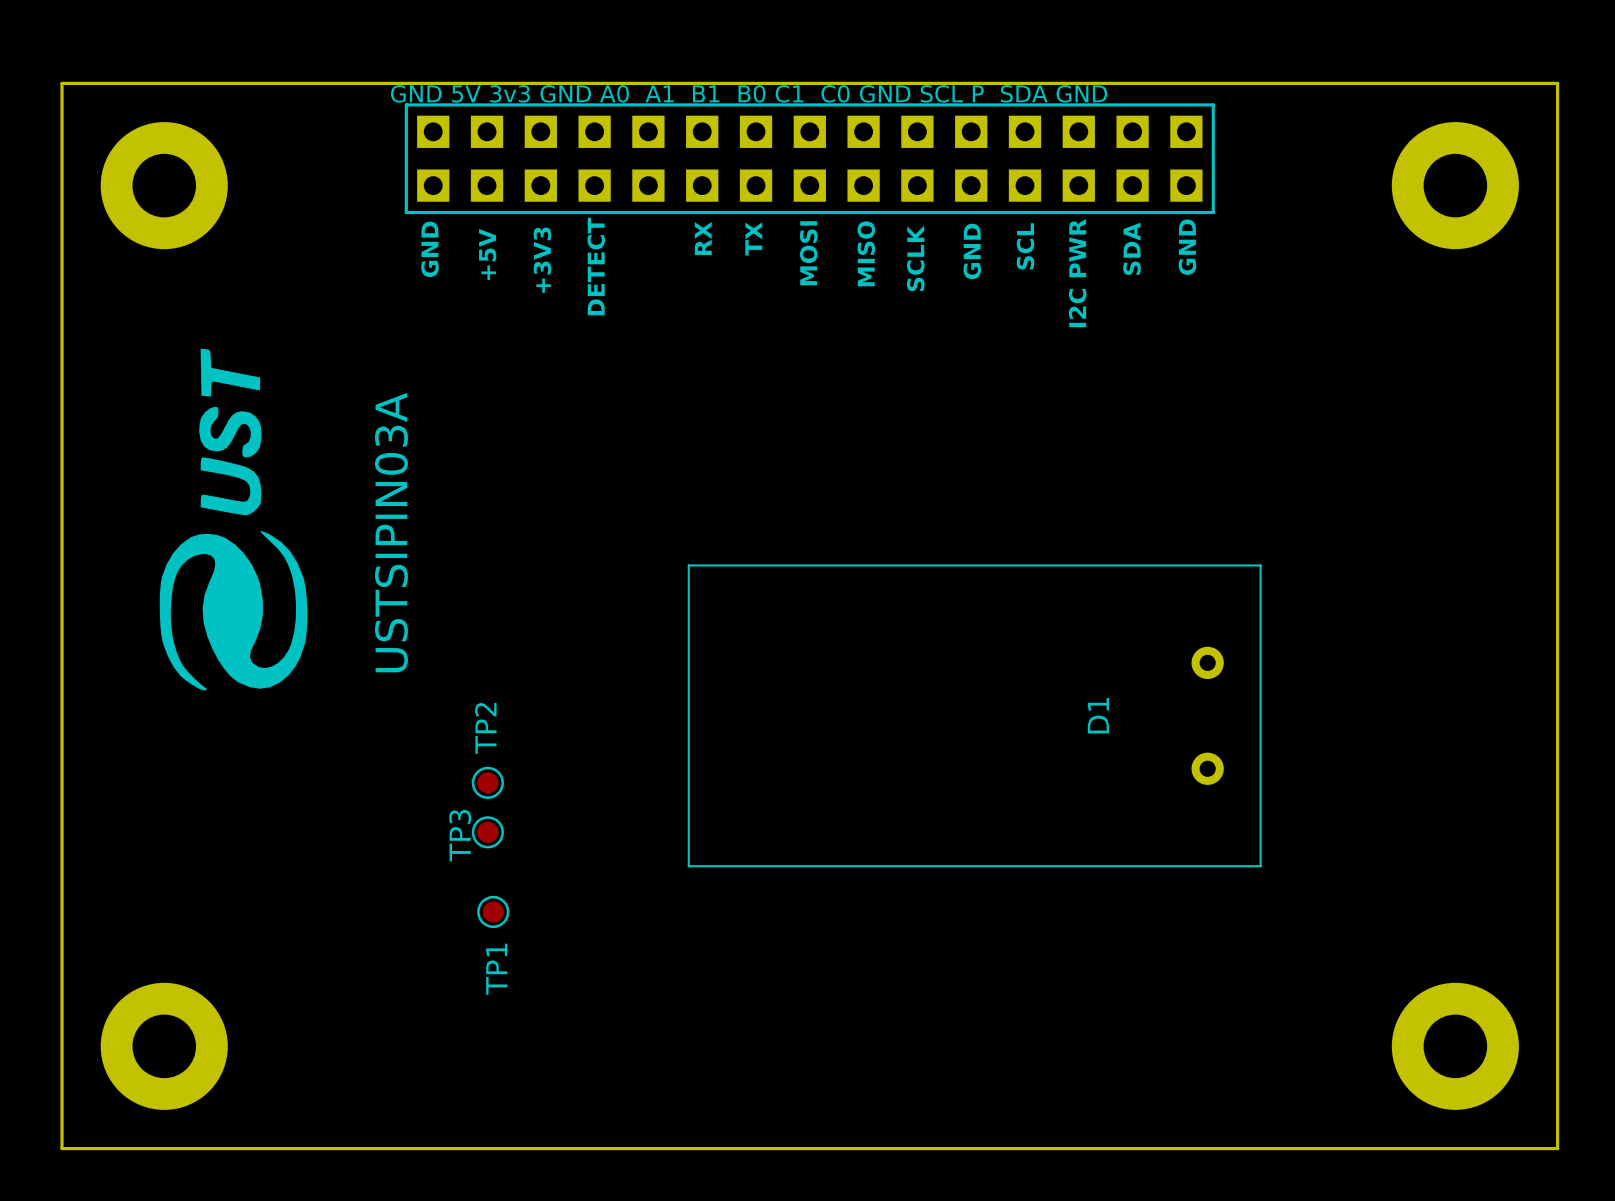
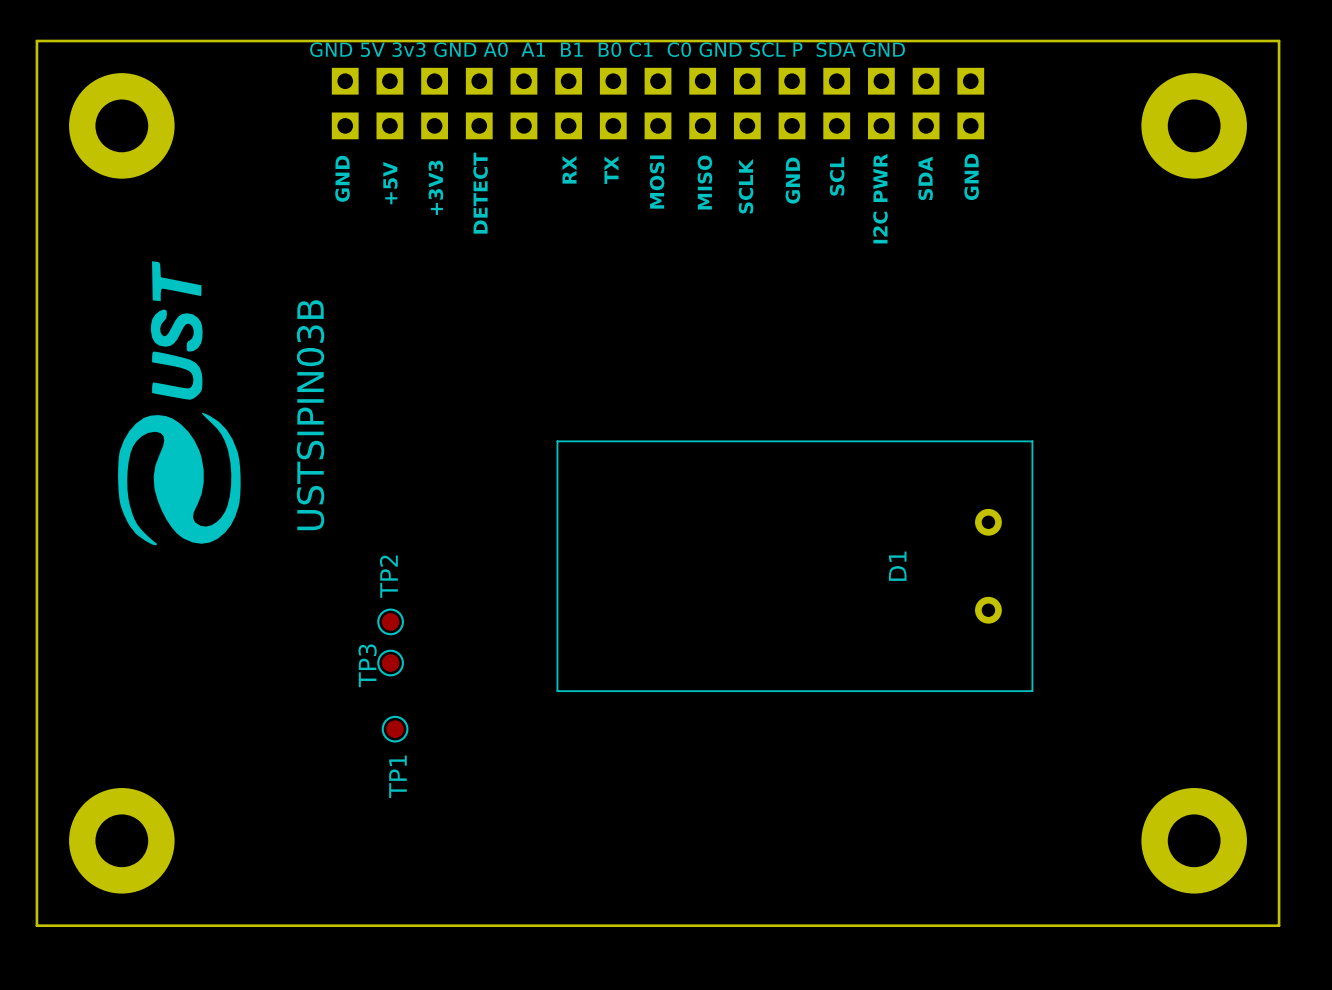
part side: top (809, 158) -> bottom (657, 103)
text: USTSIPIN03A (391, 532) -> USTSIPIN03B (310, 415)

